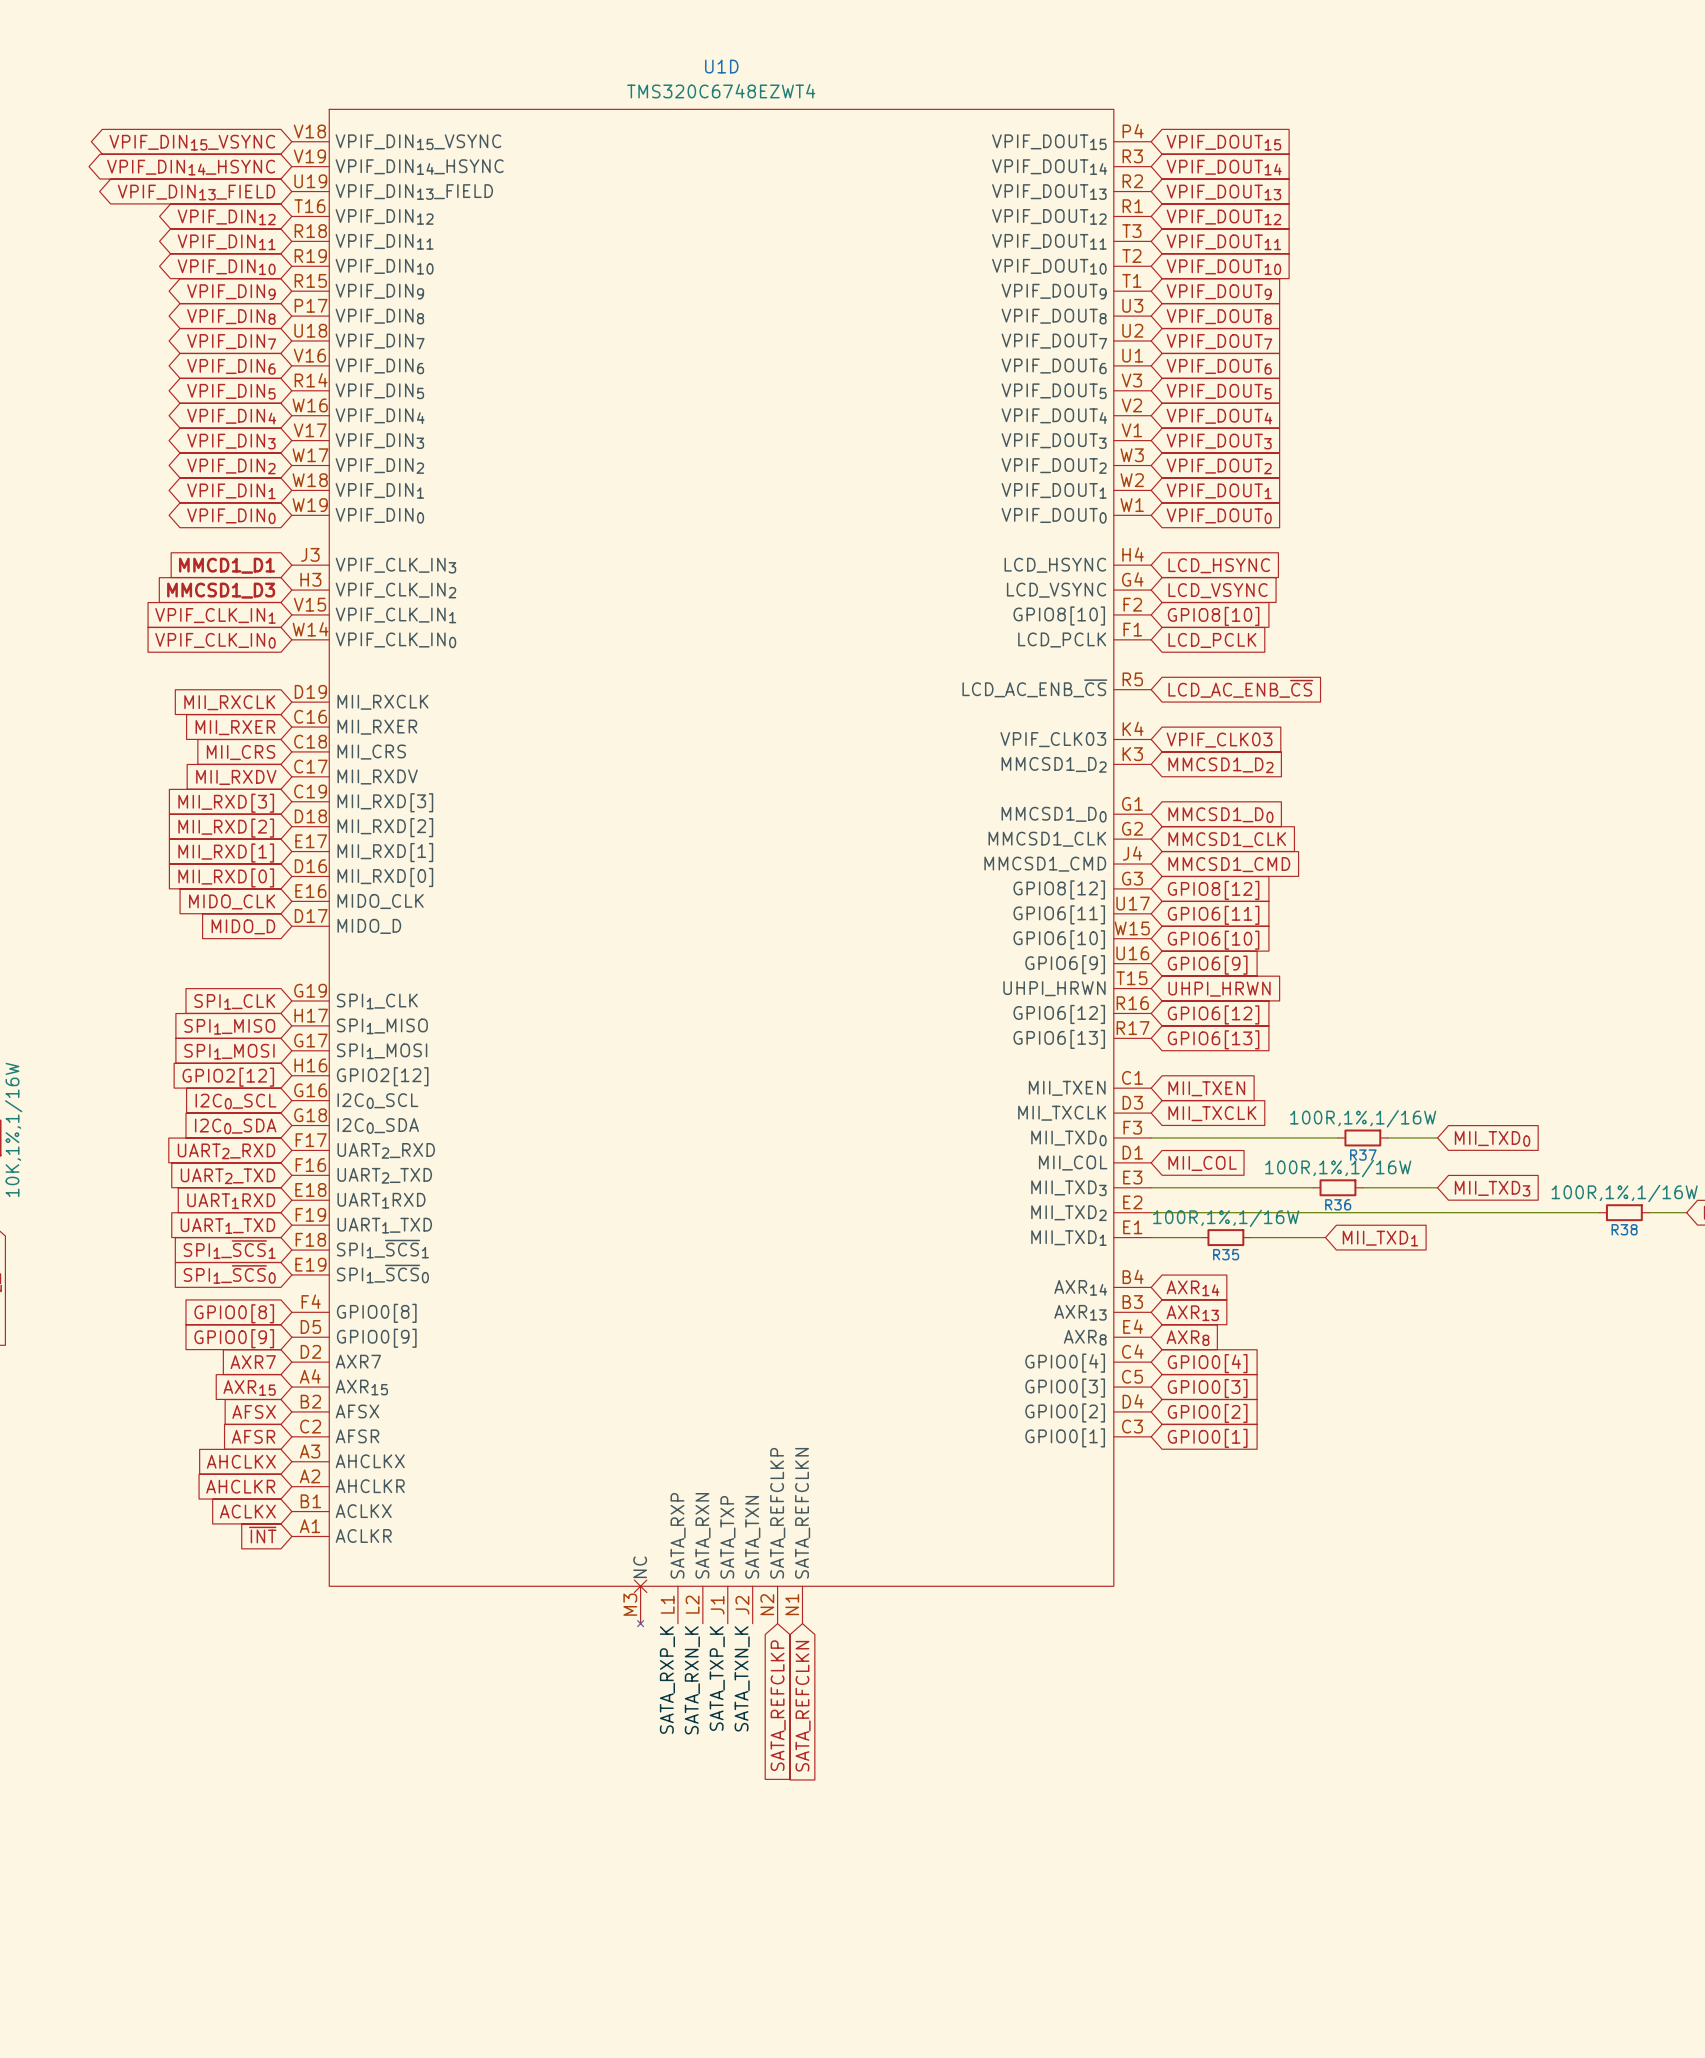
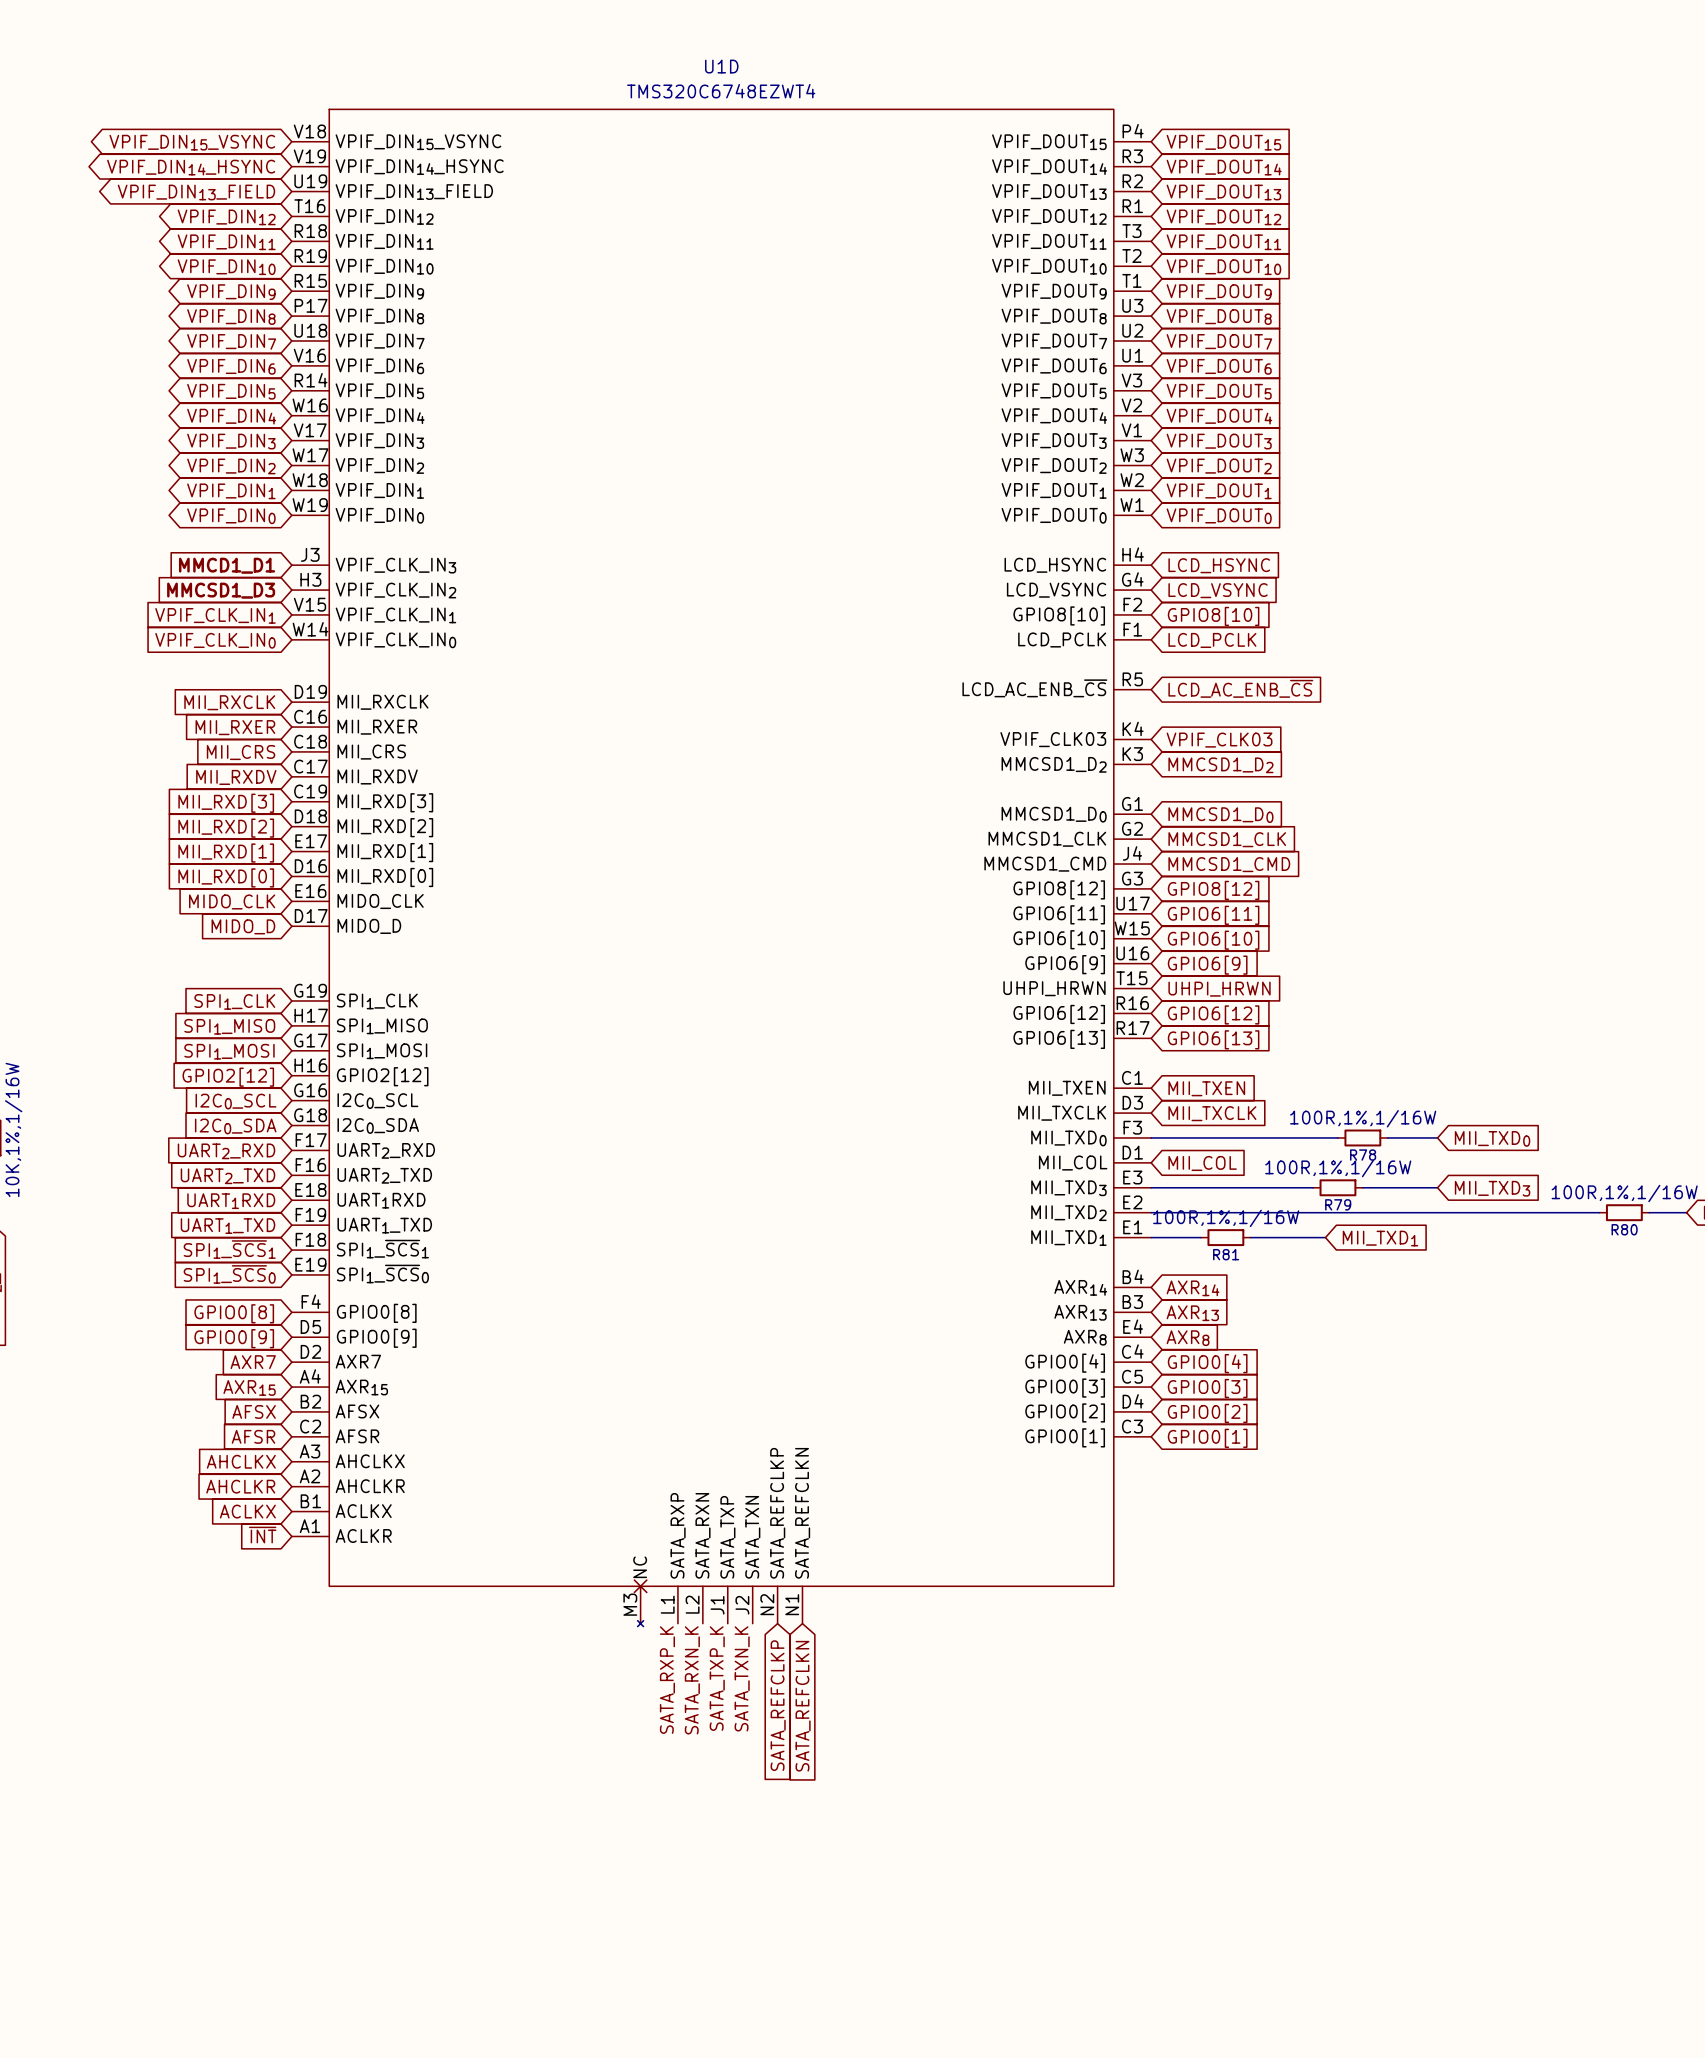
R37 name: R37 (1363, 1155) -> R78 (1363, 1155)
R36 name: R36 (1338, 1204) -> R79 (1338, 1204)
R38 name: R38 (1624, 1229) -> R80 (1624, 1229)
R35 name: R35 (1226, 1254) -> R81 (1226, 1254)

